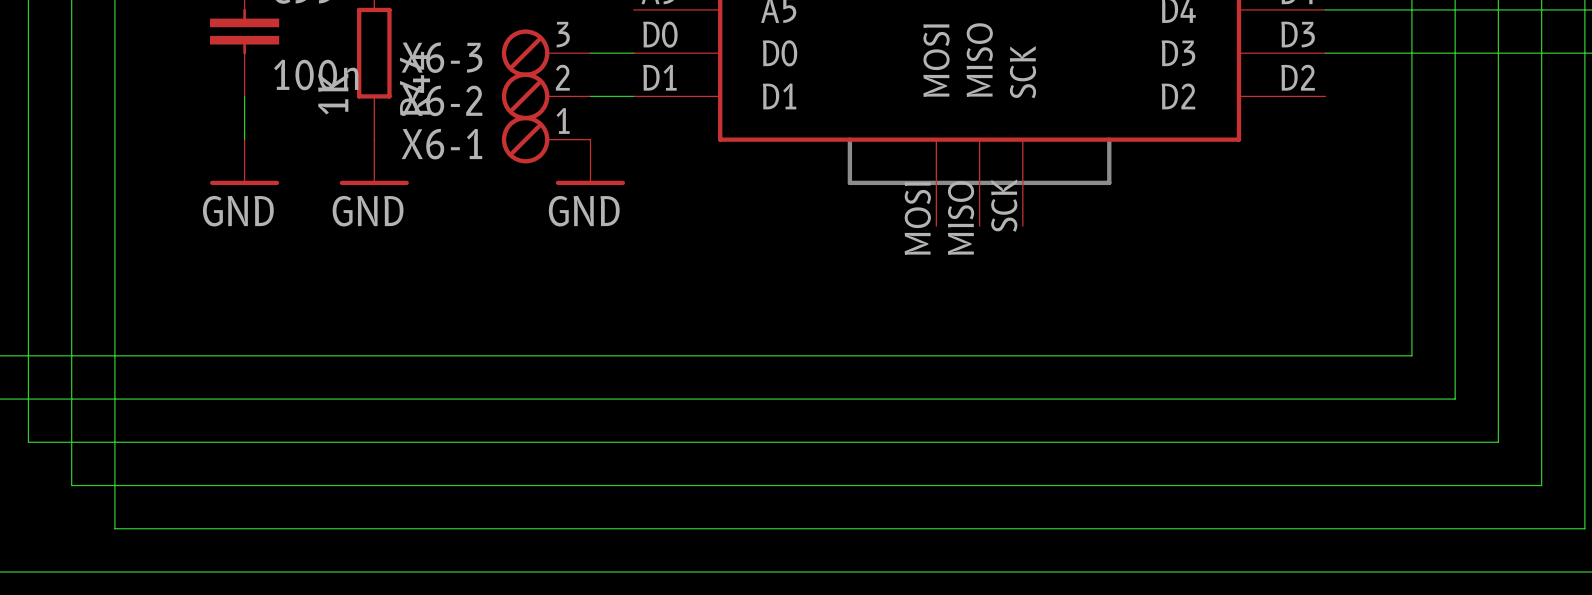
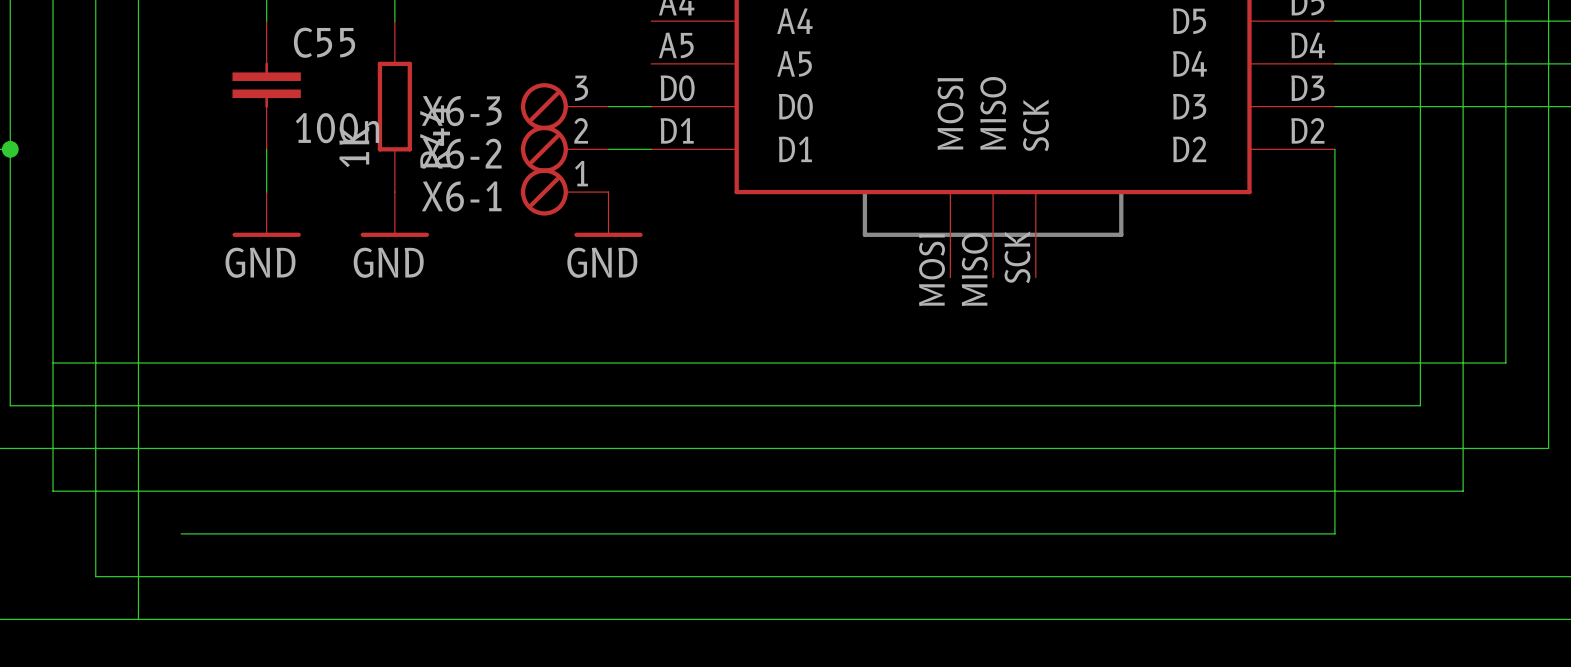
wire: none -> (53, 362) (1505, 362)
wire: (1498, 312) (1498, 442) (1455, 442) -> (1548, 448) (1463, 448) (1463, 491)
wire: (1541, 399) (1541, 485) (1325, 485) -> (1334, 149) (1334, 533)
wire: (71, 485) (158, 485) -> (95, 533) (95, 576) (138, 576) (138, 619)

